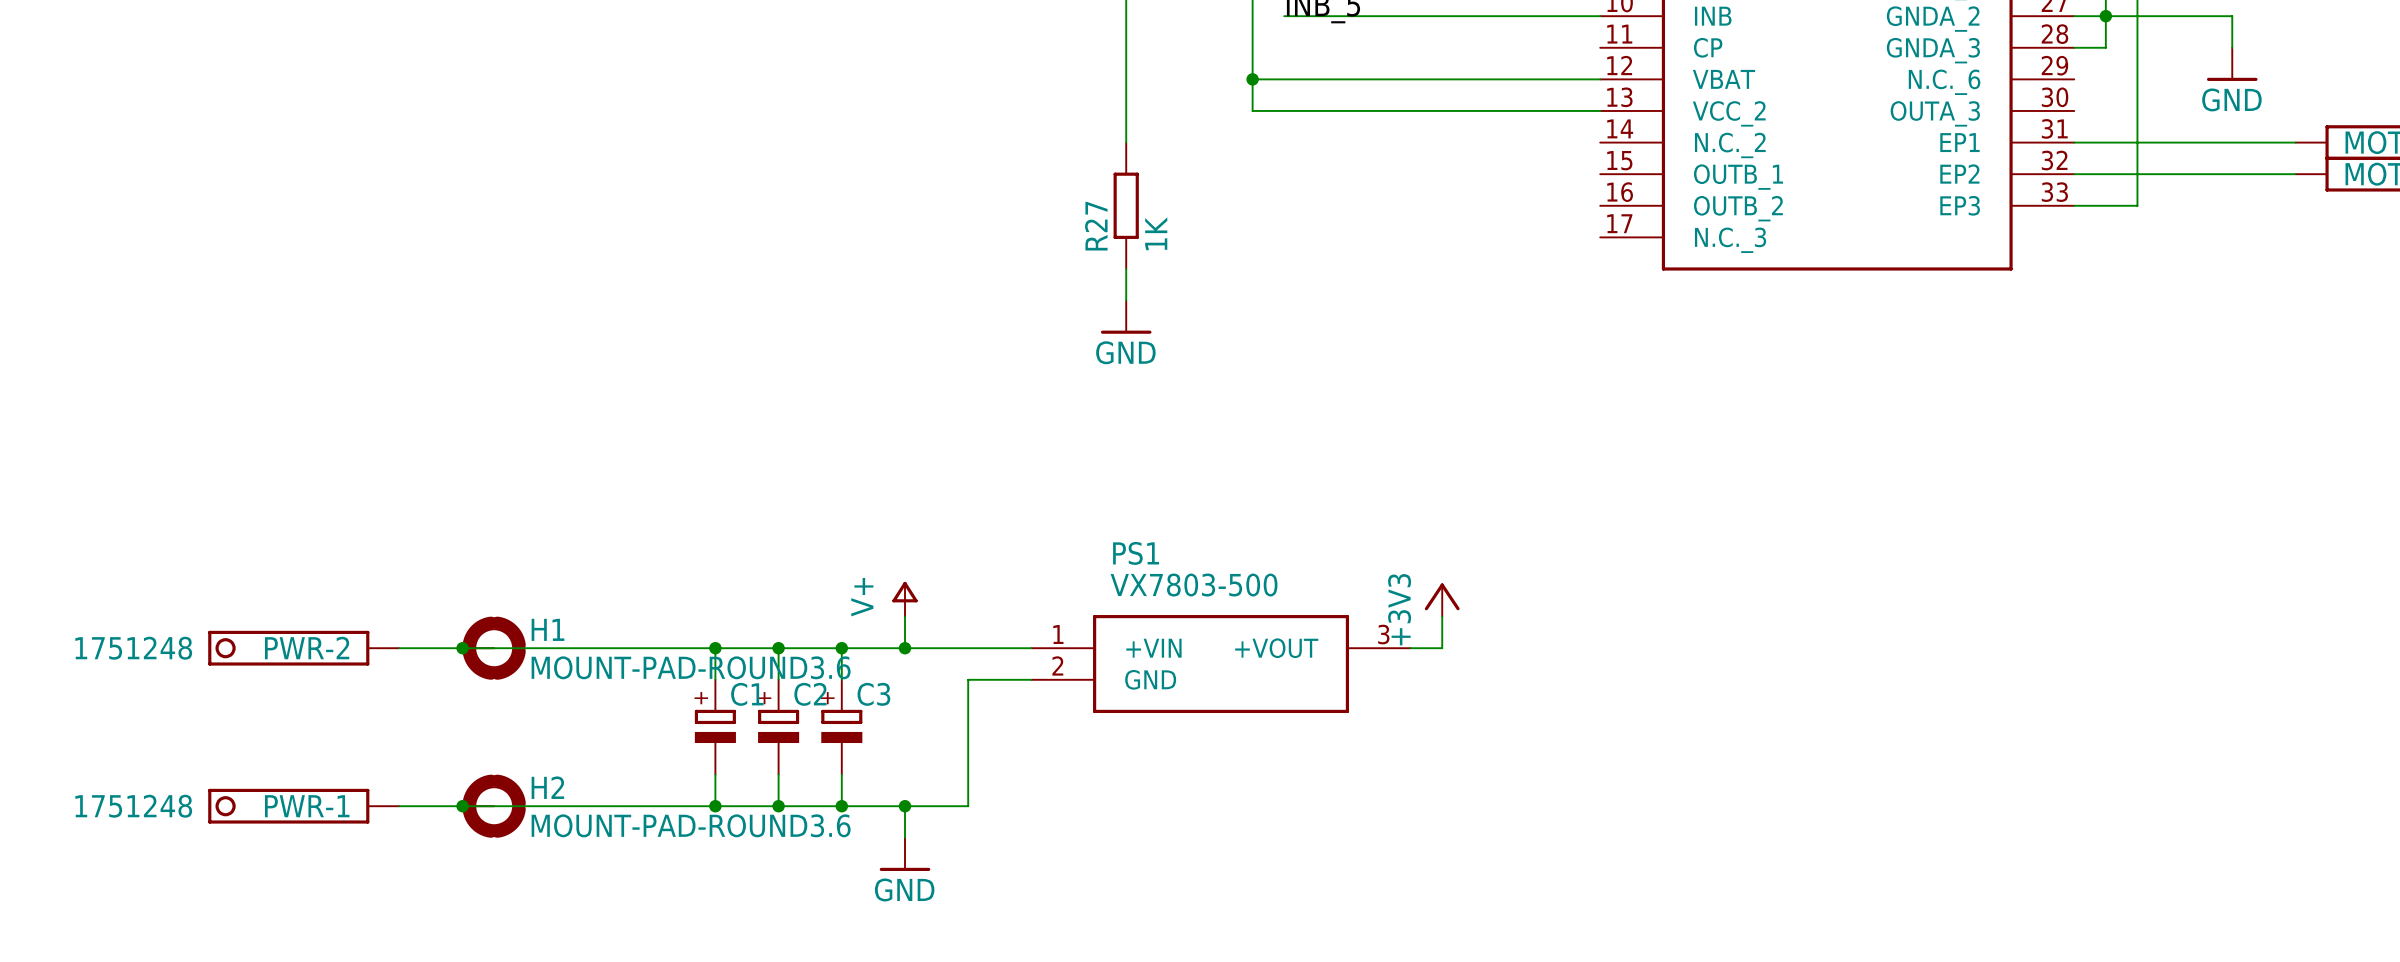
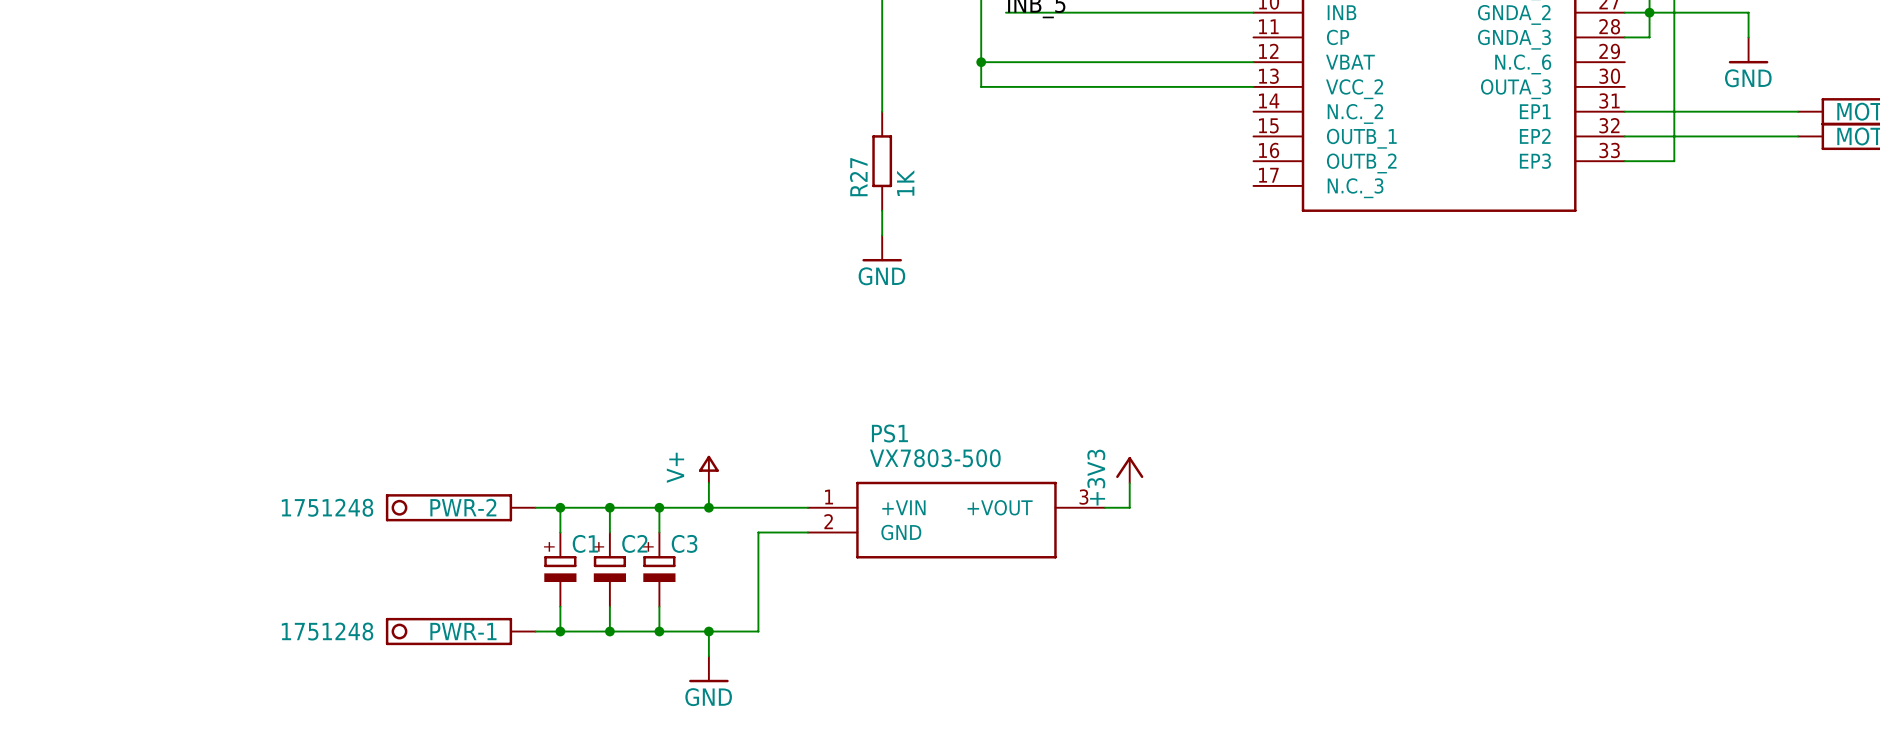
PWR-2 position: (303, 648) -> (460, 507)
wire: (399, 648) (683, 648) -> none
junction: (462, 648) -> none
H1: MOUNT-PAD-ROUND3.6 (494, 648) -> none
PWR-1 position: (303, 806) -> (460, 631)
wire: (399, 806) (683, 806) -> none
junction: (462, 806) -> none
H2: MOUNT-PAD-ROUND3.6 (494, 806) -> none

